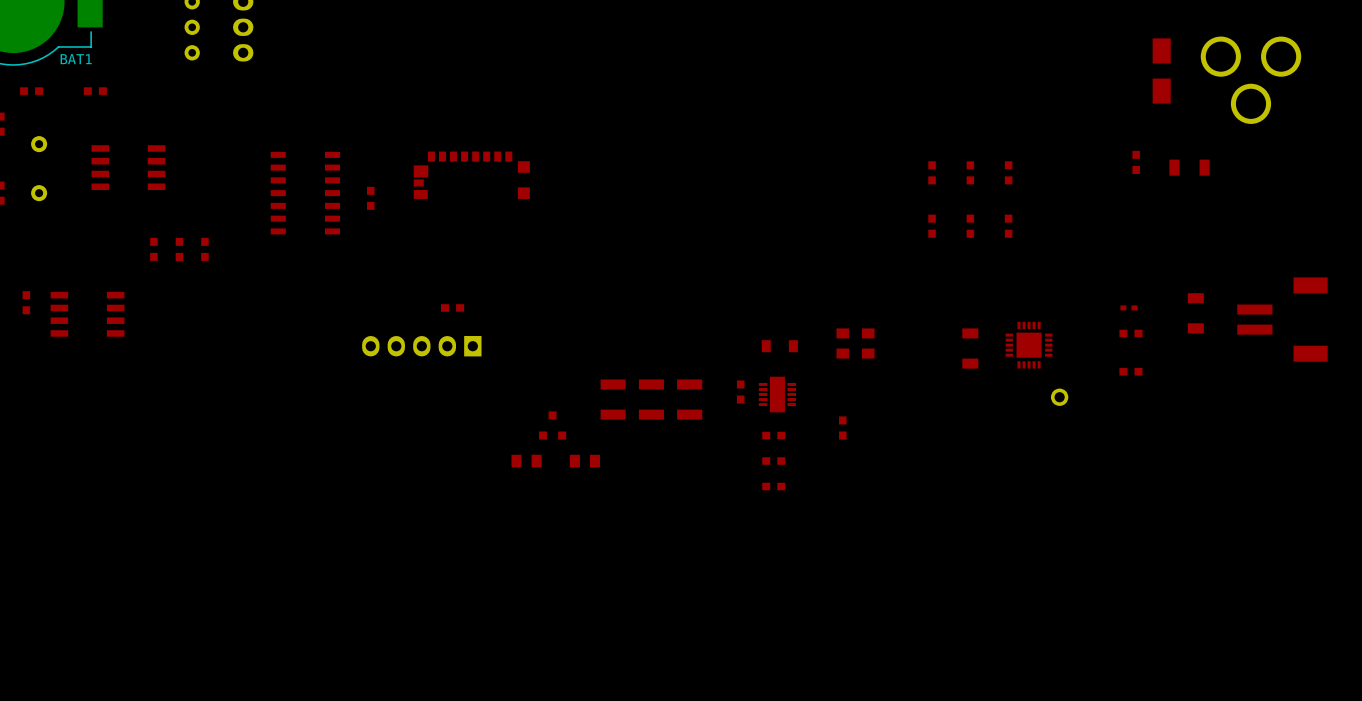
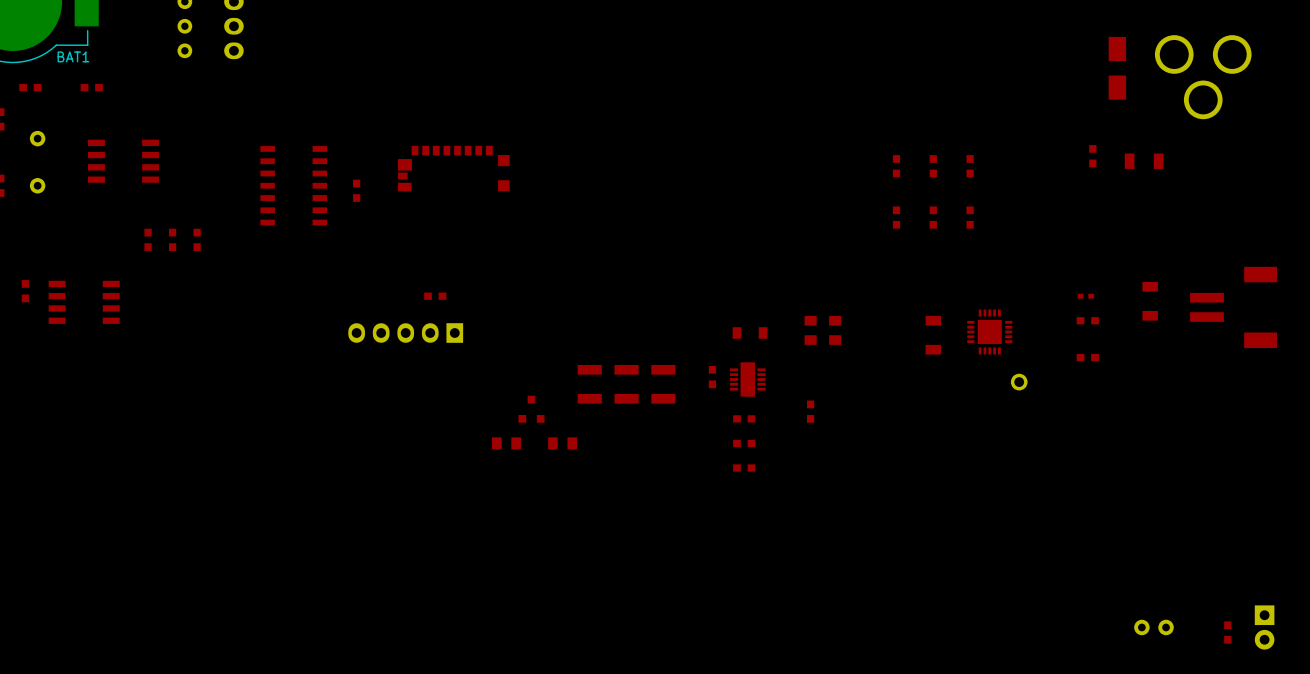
part: none -> (1153, 627)
part: none -> (1264, 627)
part: none -> (1227, 632)

